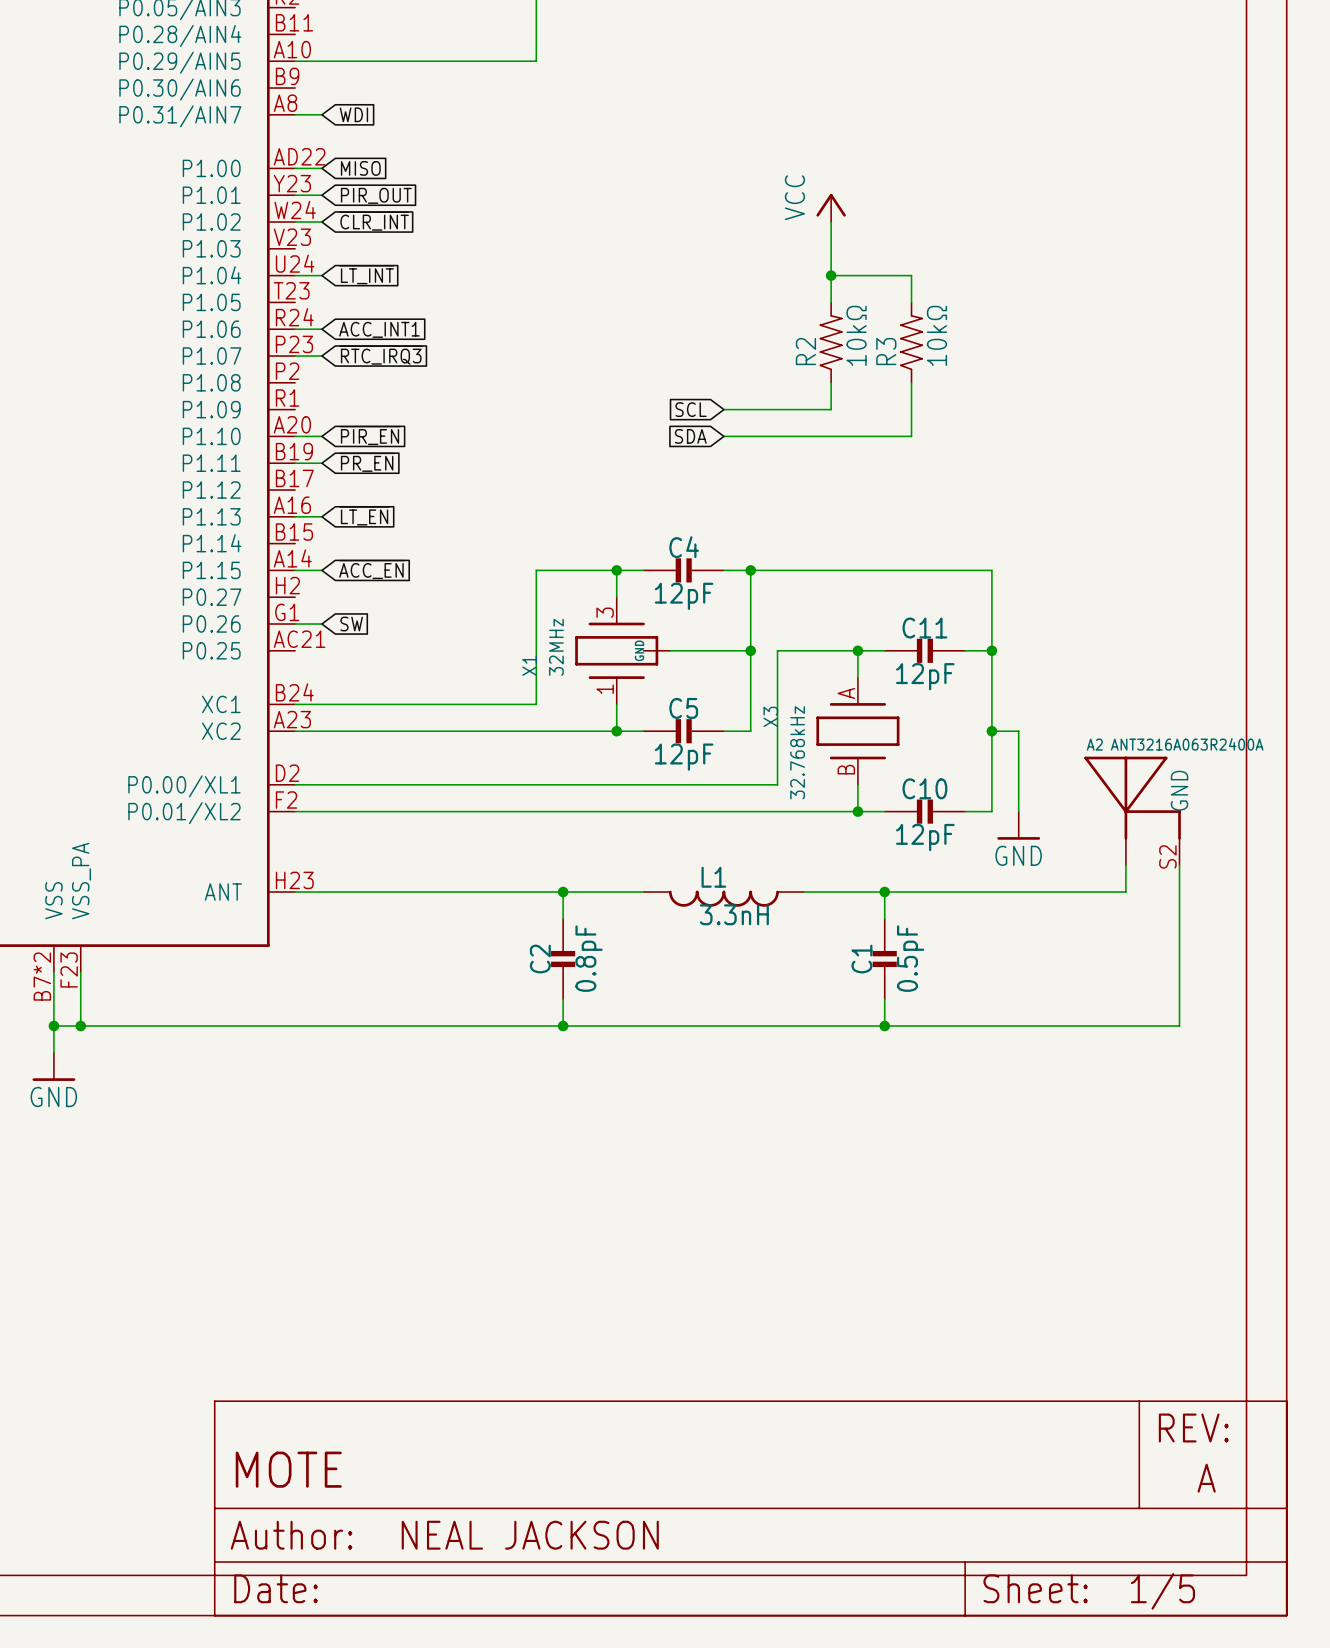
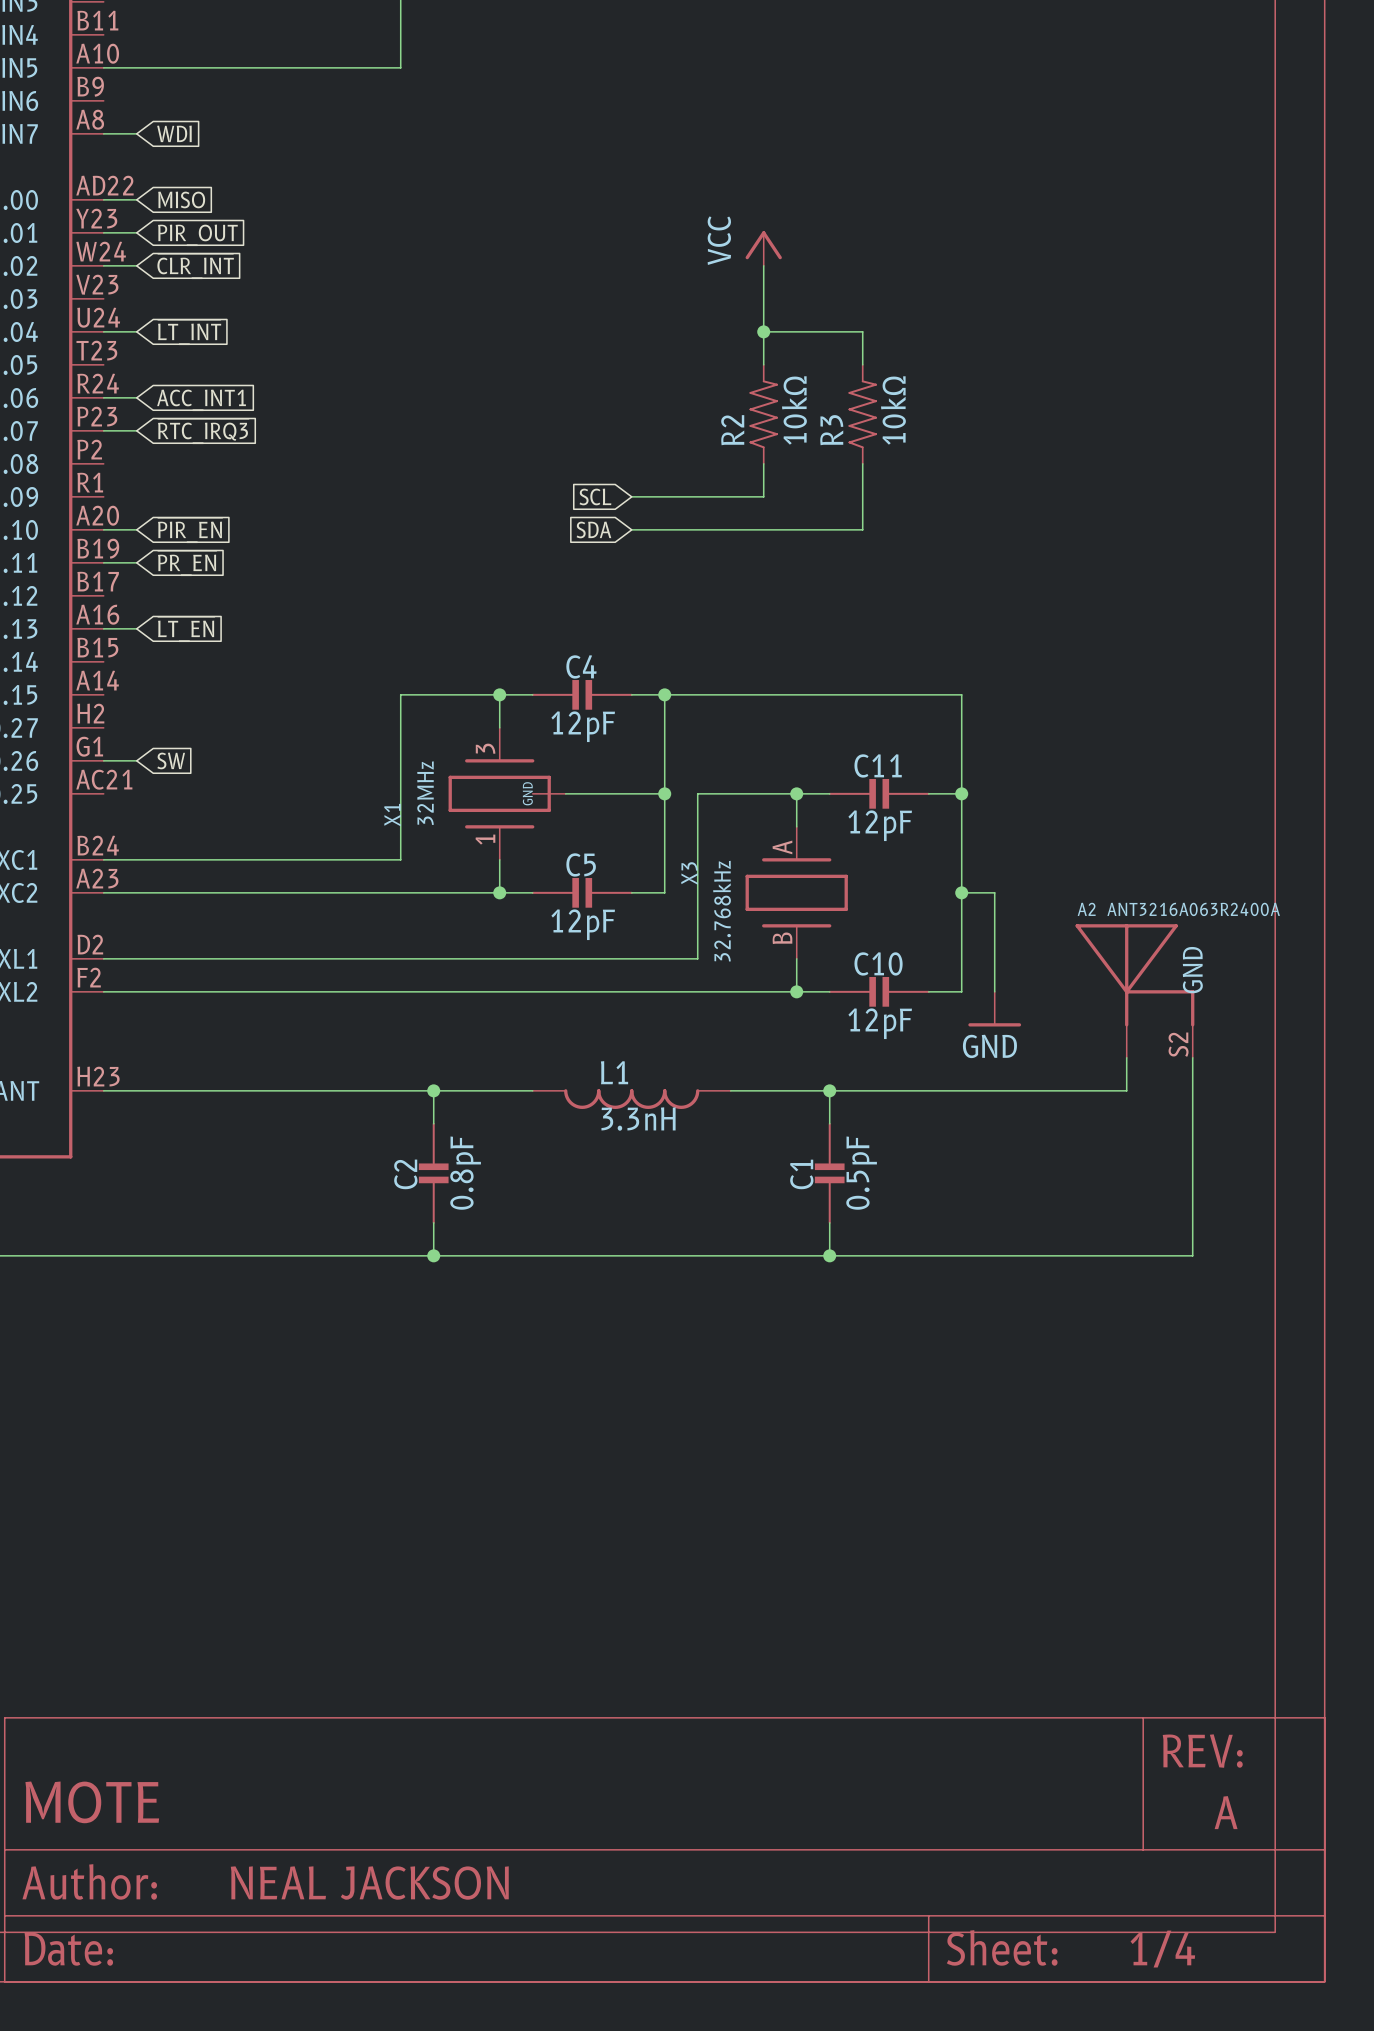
global label: ~{ACC_EN} (372, 569) -> none
wire: (295, 570) (321, 570) -> none
part text: 1/5 (1162, 1591) -> 1/4 (1162, 1949)

